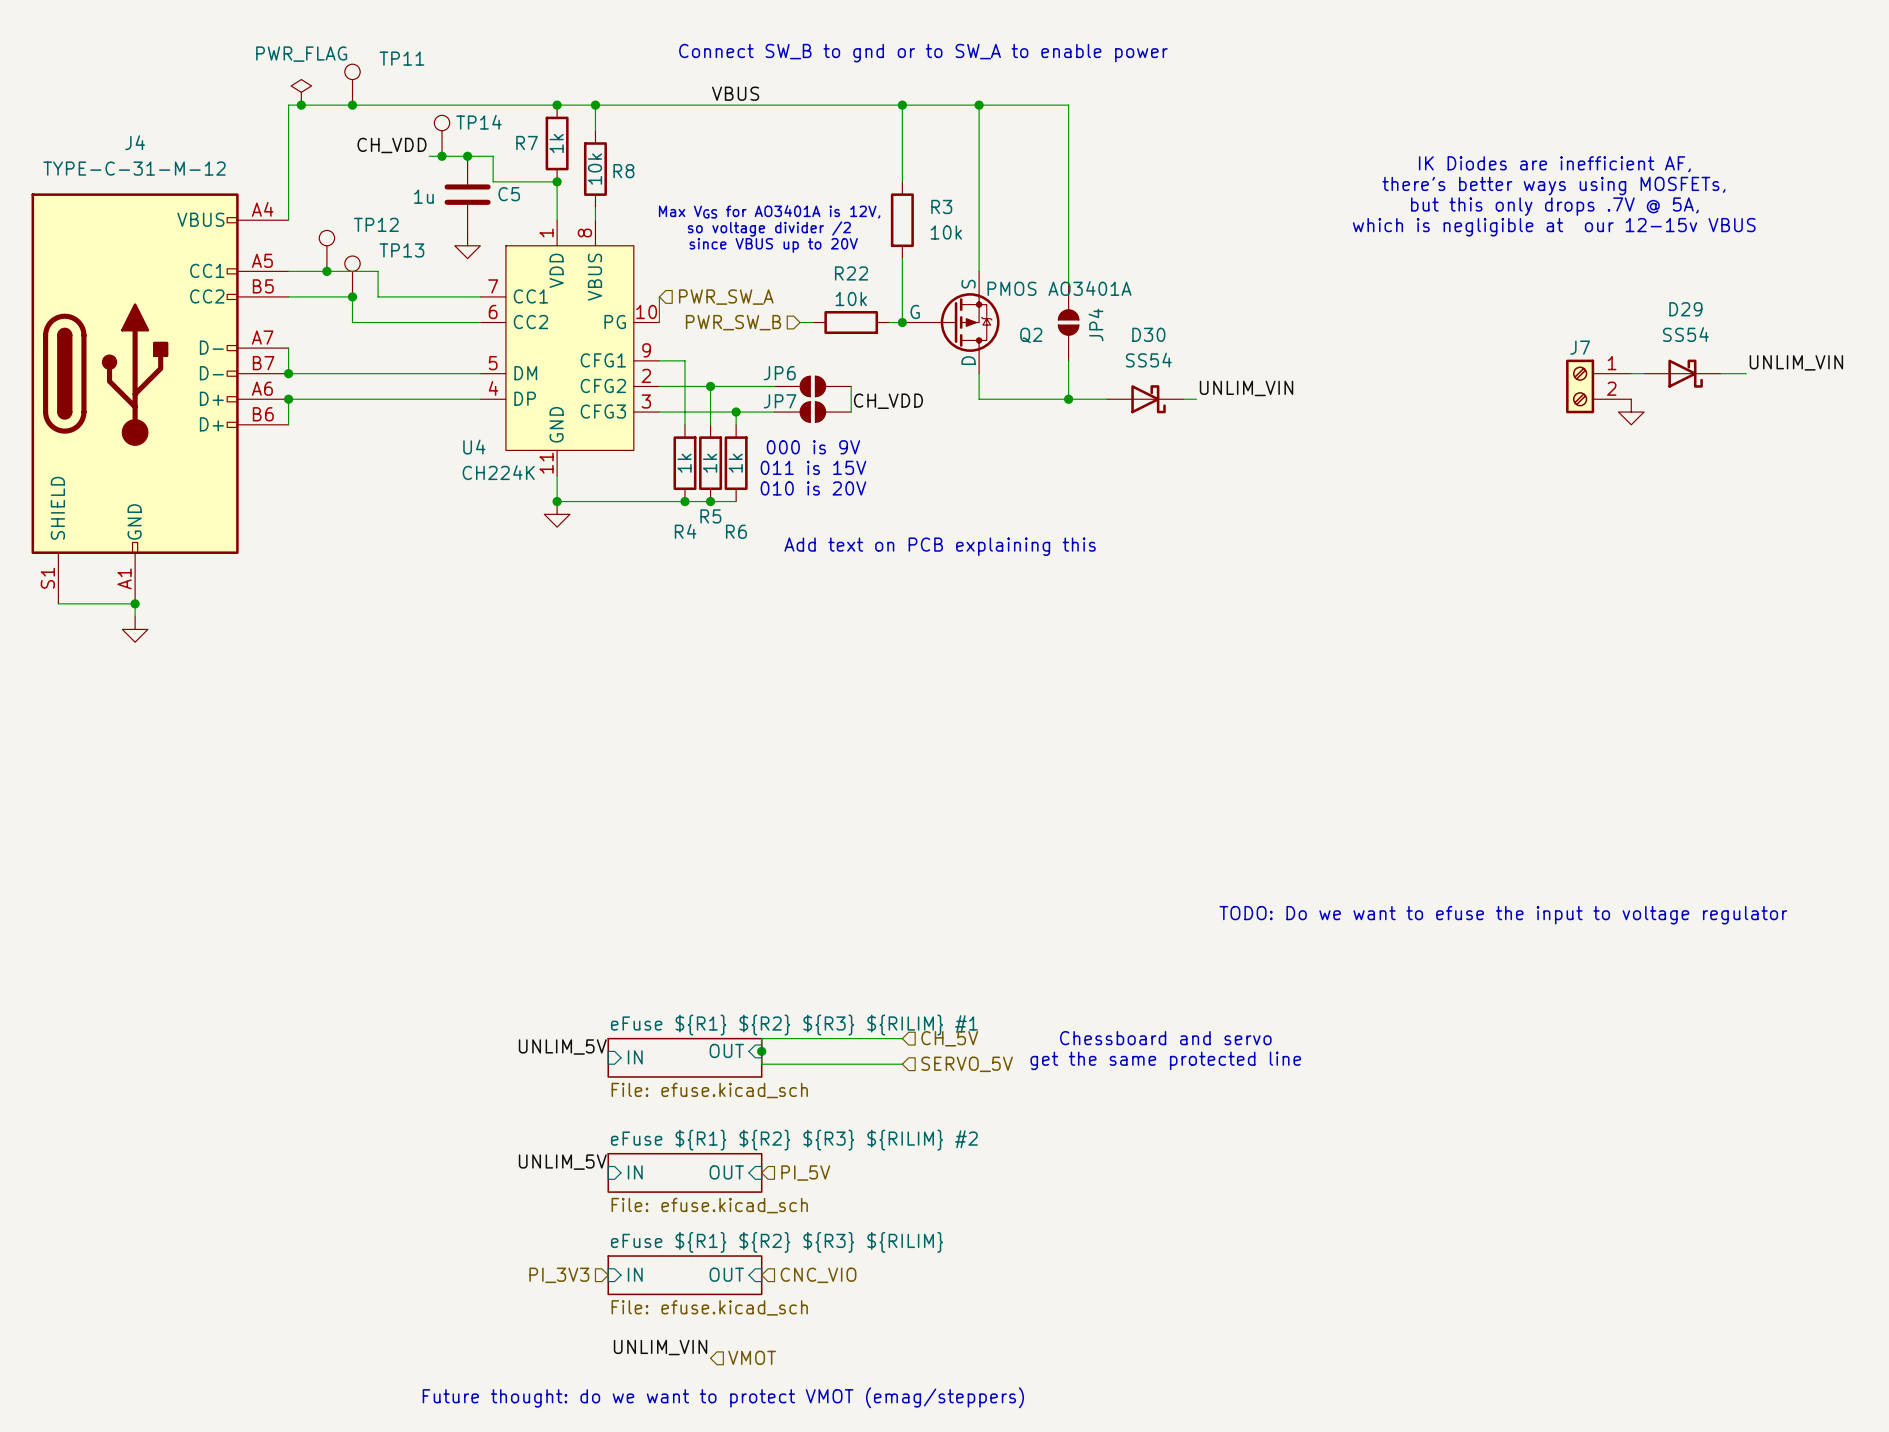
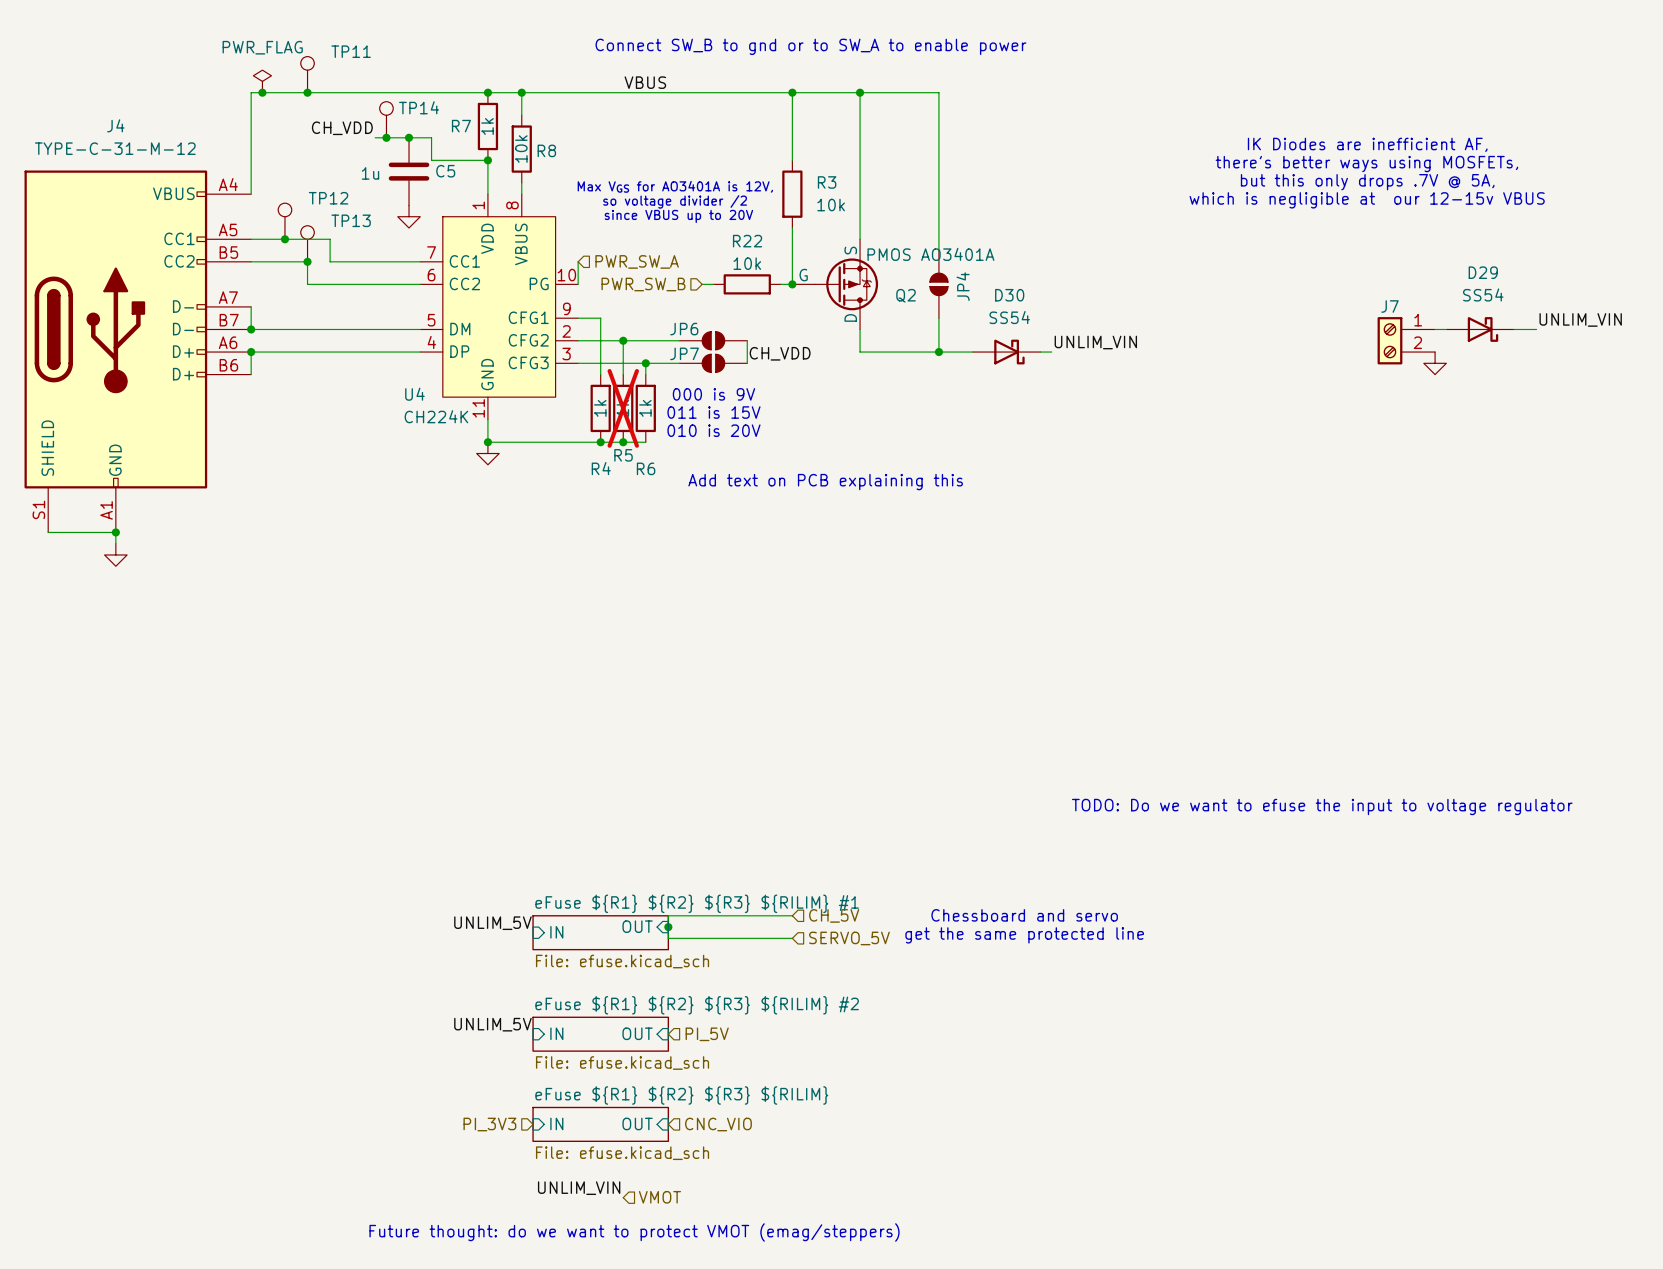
R5 do-not-place cross: none -> (623, 408)

